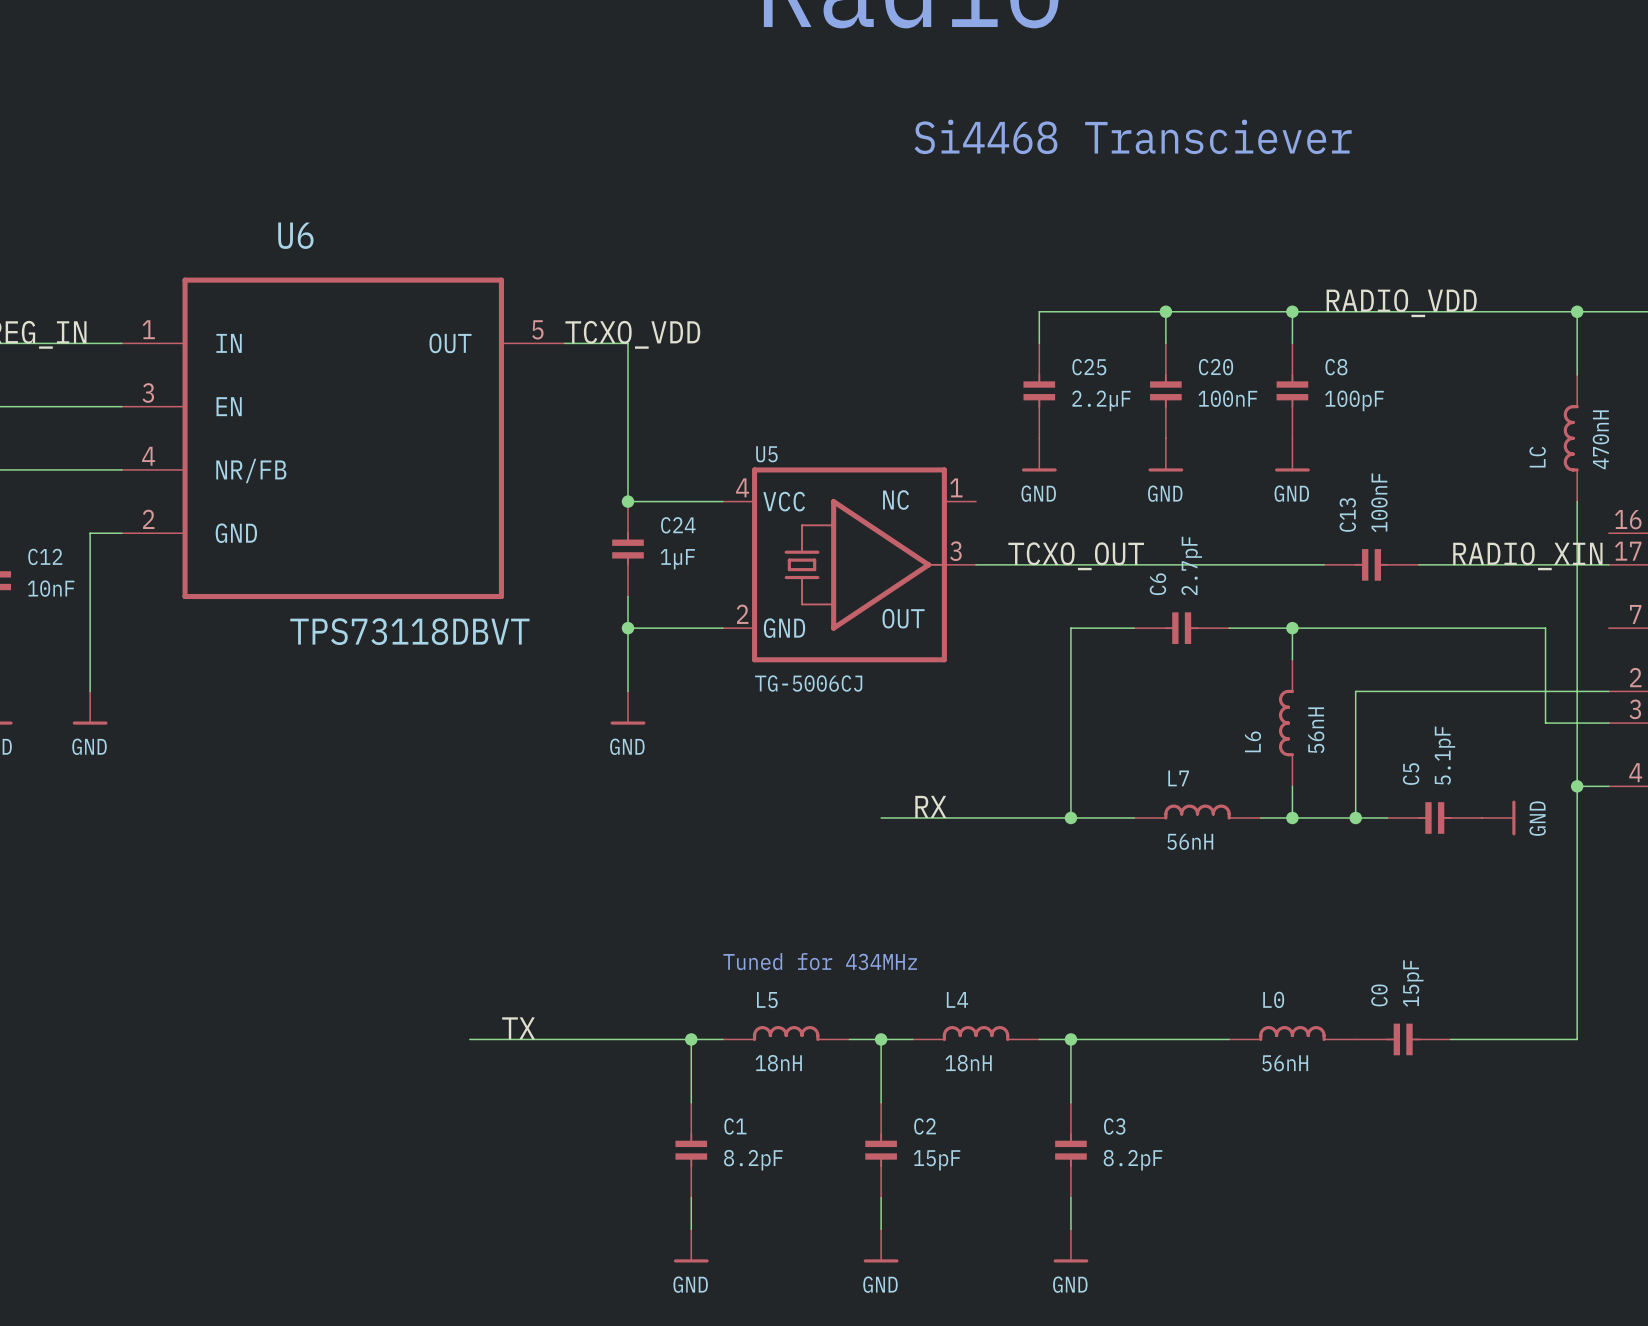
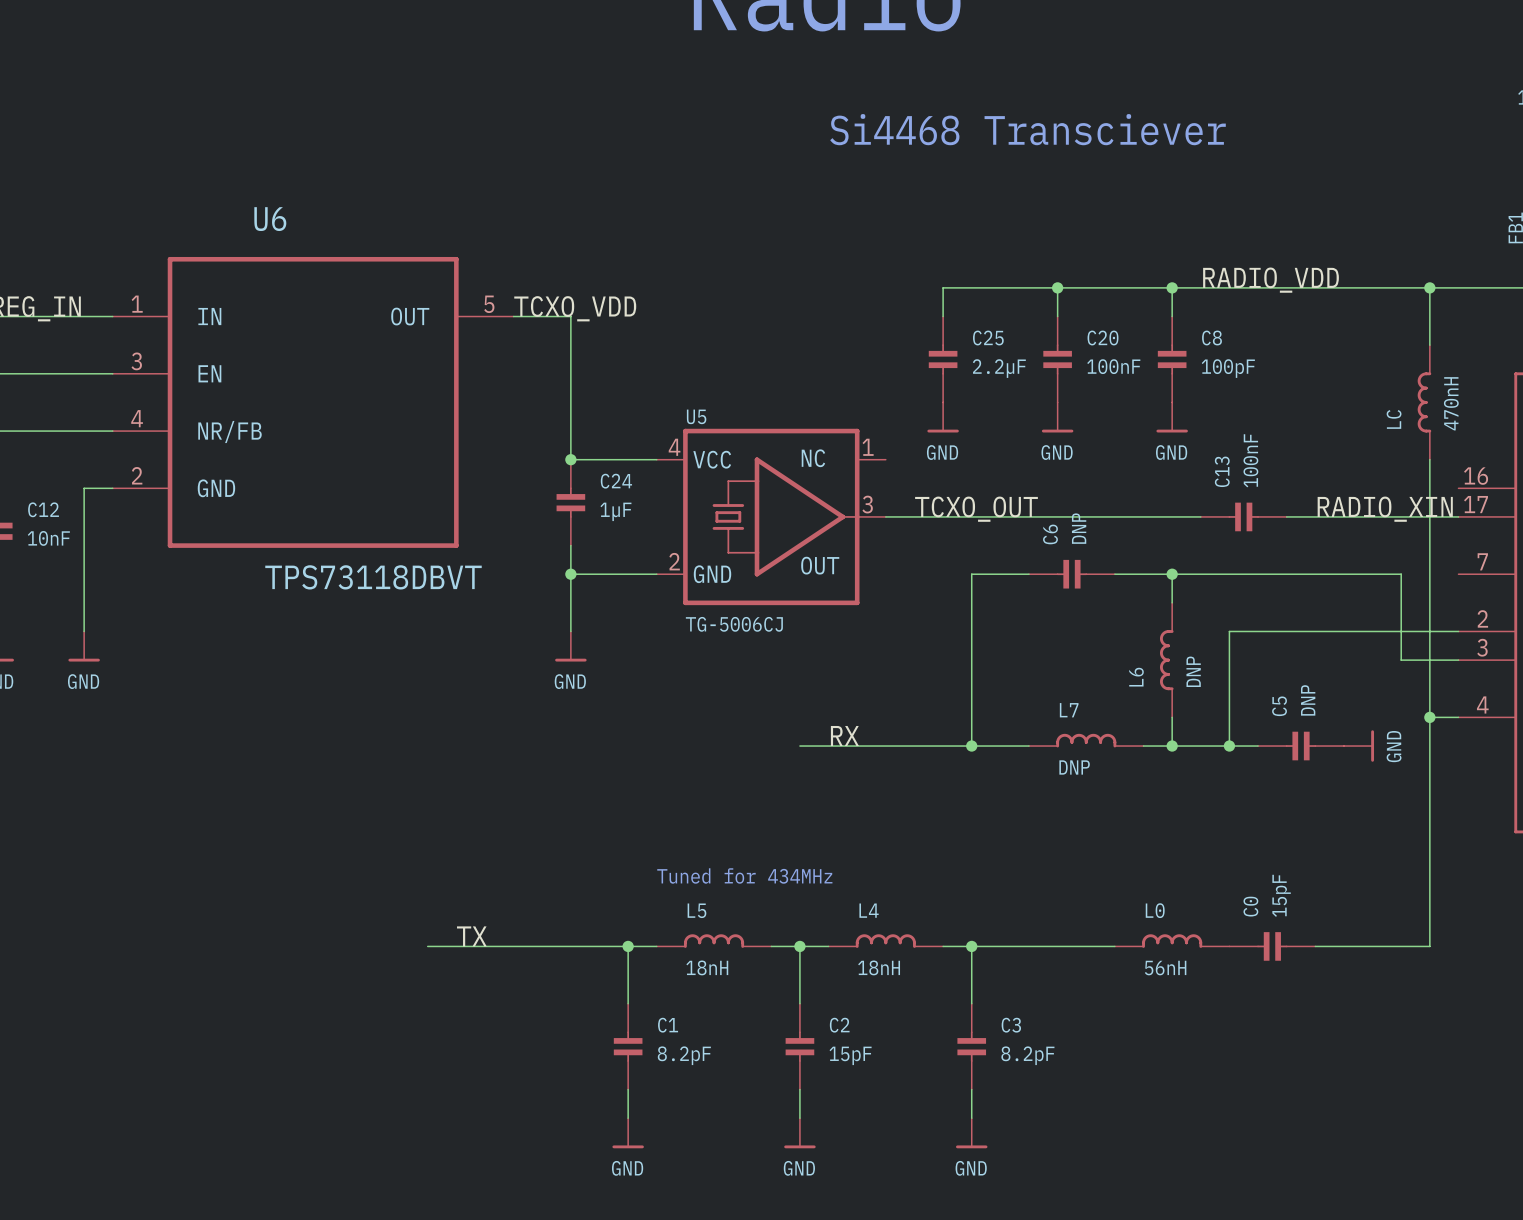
C6 value: 2.7pF (1191, 565) -> DNP (1079, 528)
L6 value: 56nH (1316, 730) -> DNP (1193, 671)
C5 value: 5.1pF (1444, 755) -> DNP (1308, 700)
L7 value: 56nH (1190, 841) -> DNP (1074, 767)

